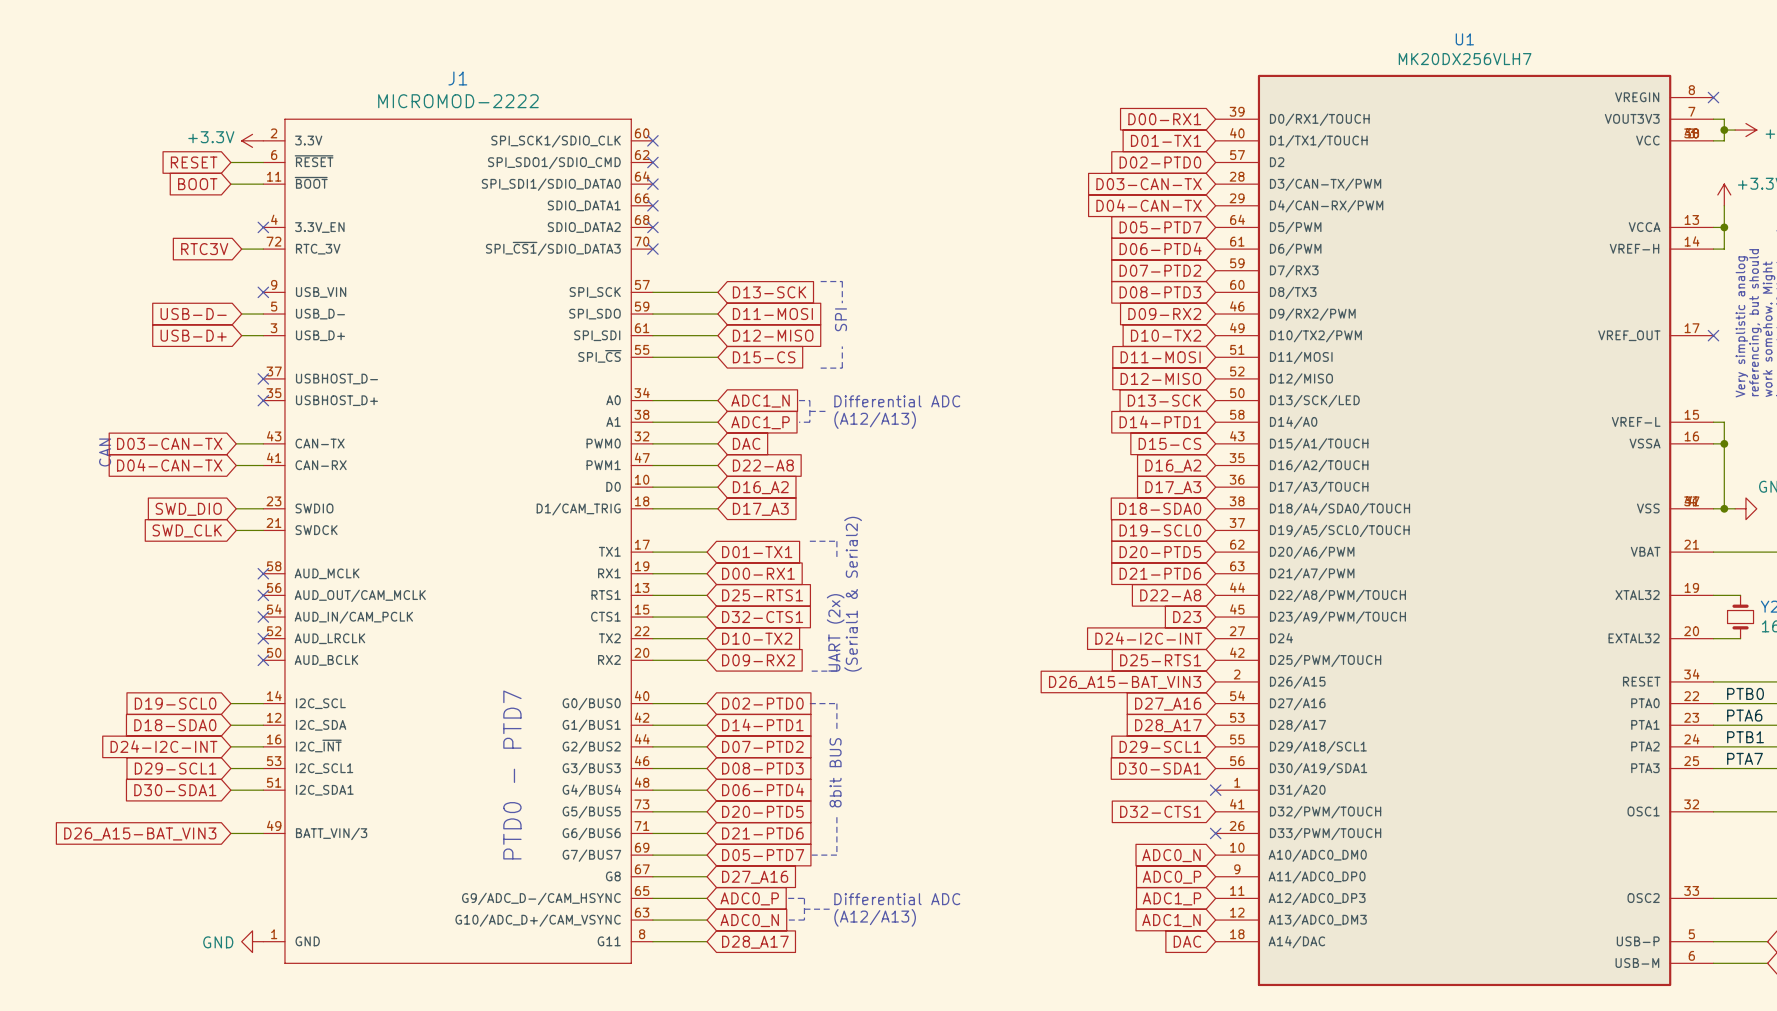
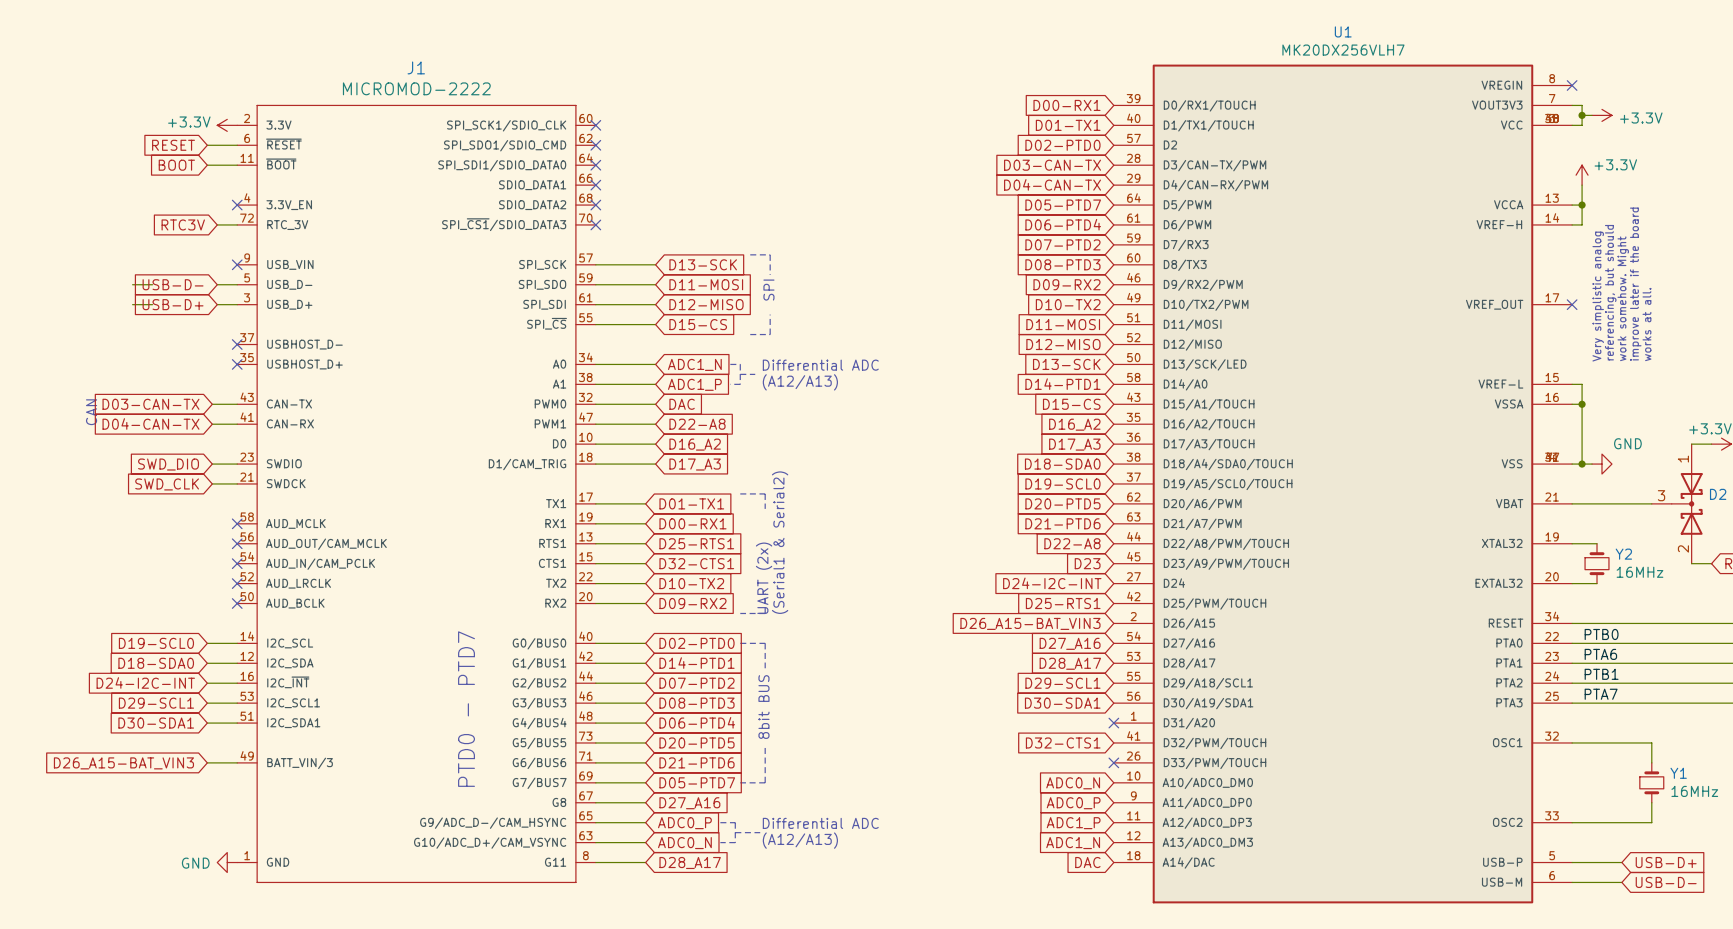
wire: none -> (132, 284) (152, 284)
wire: none -> (132, 304) (152, 304)

